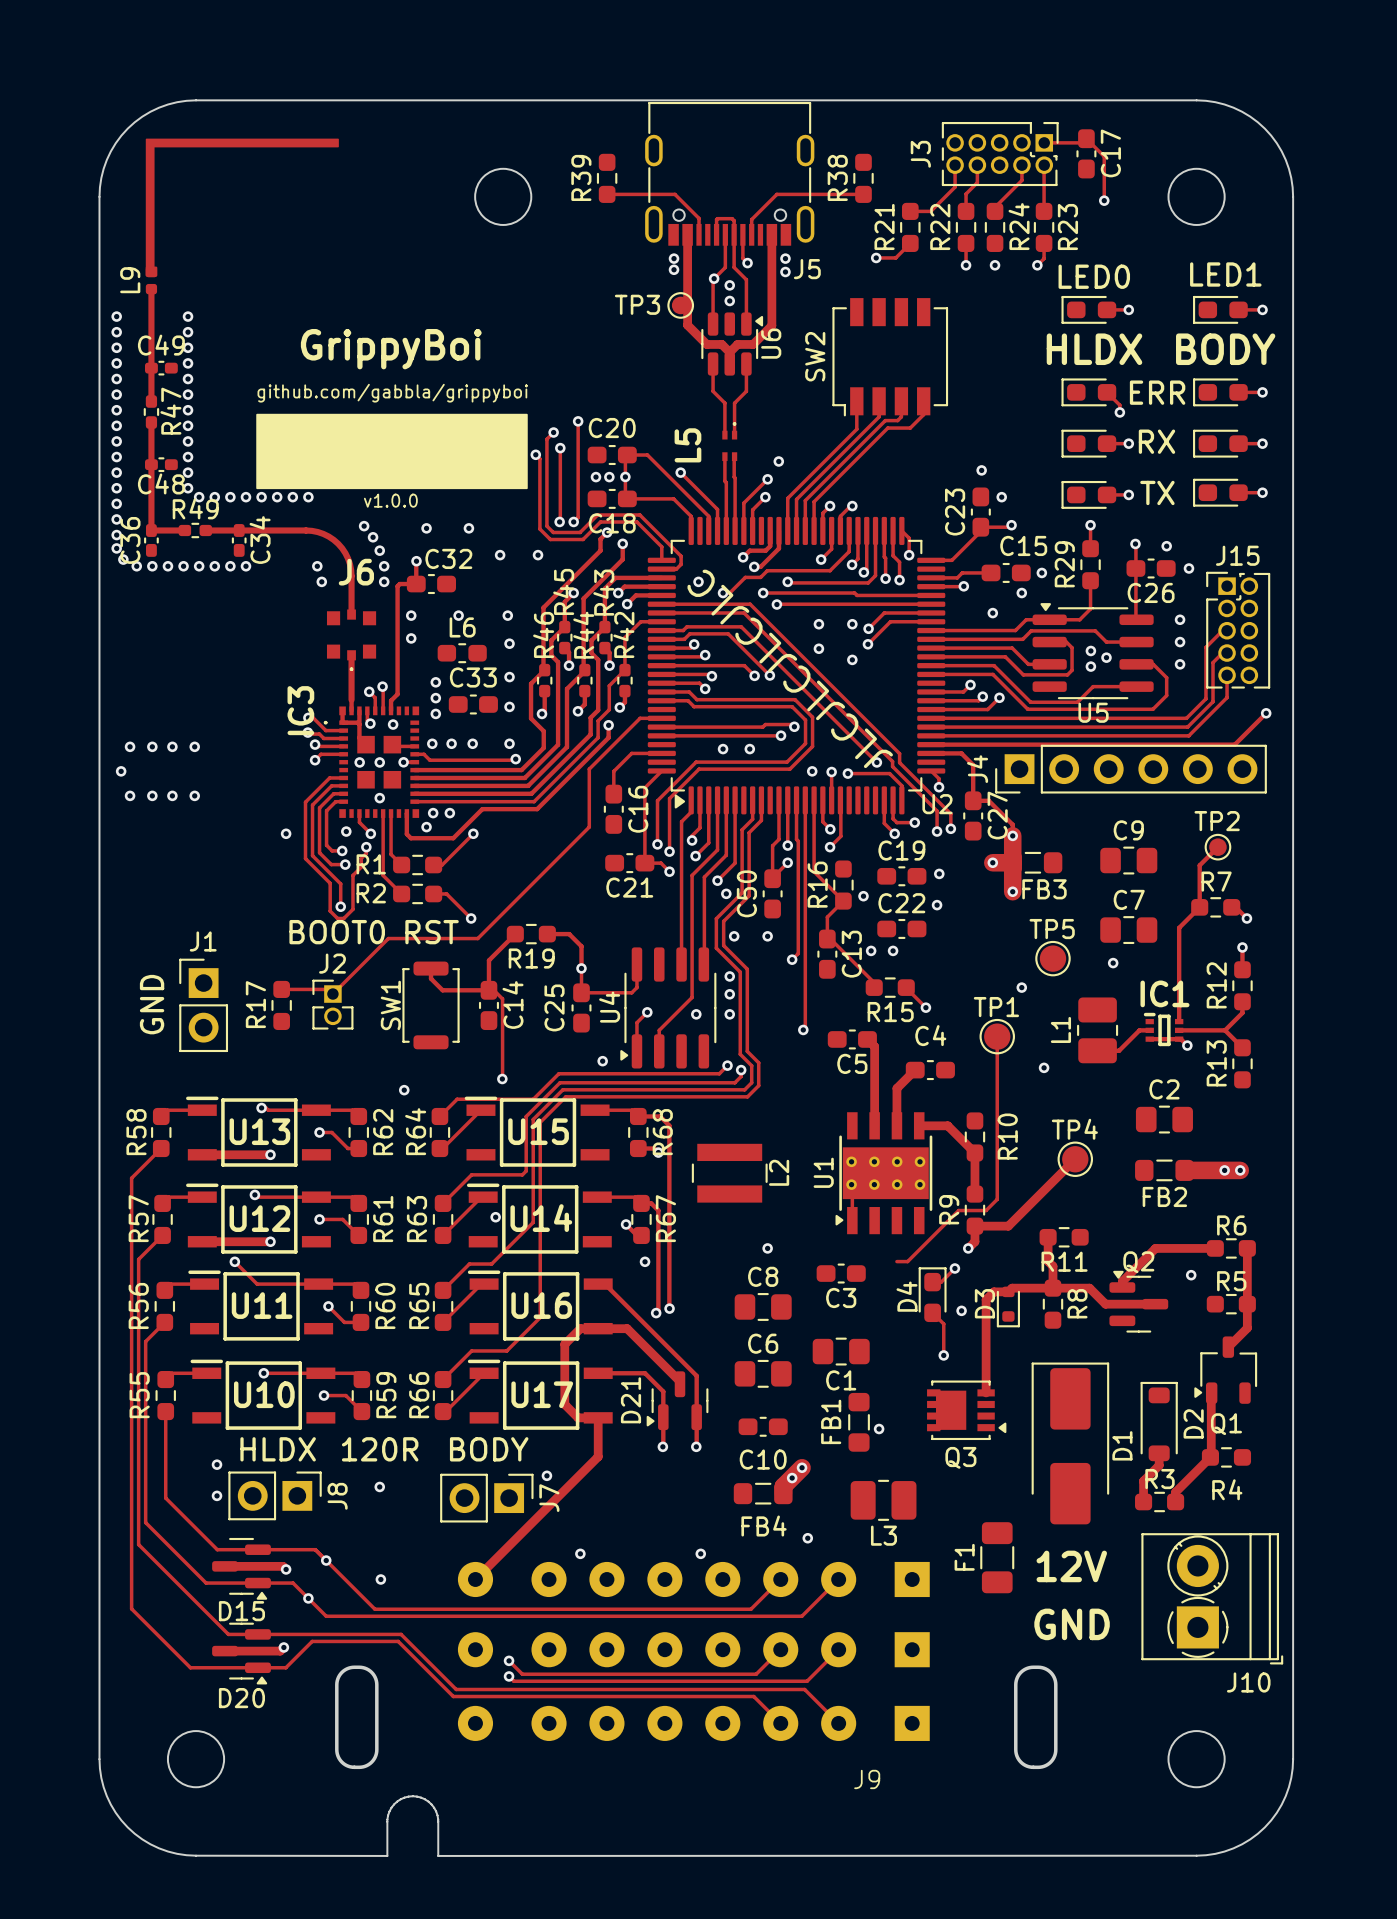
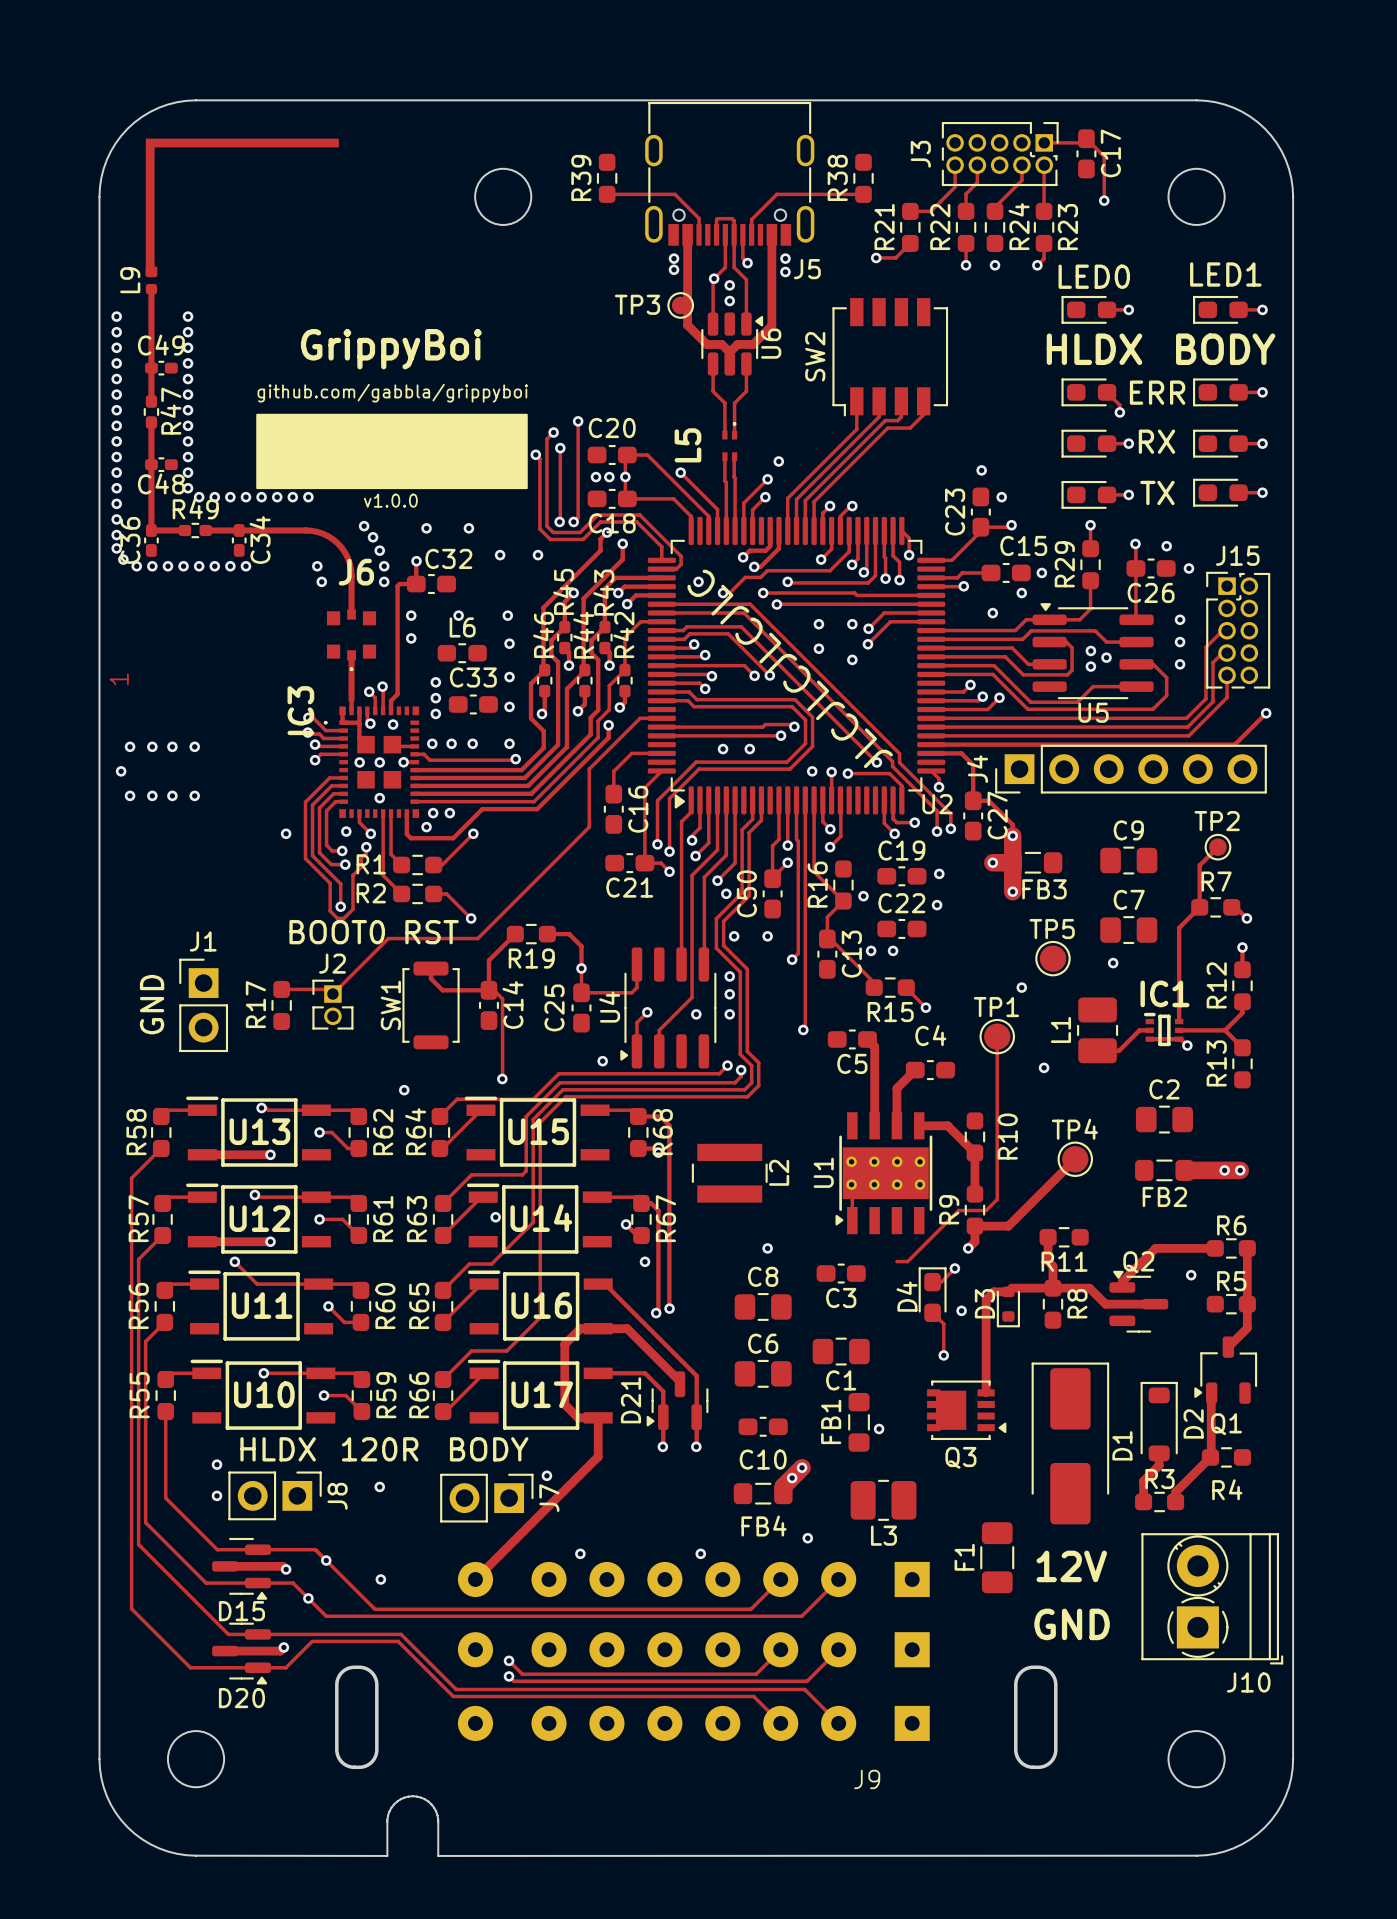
text: none -> 1 (119, 679)

